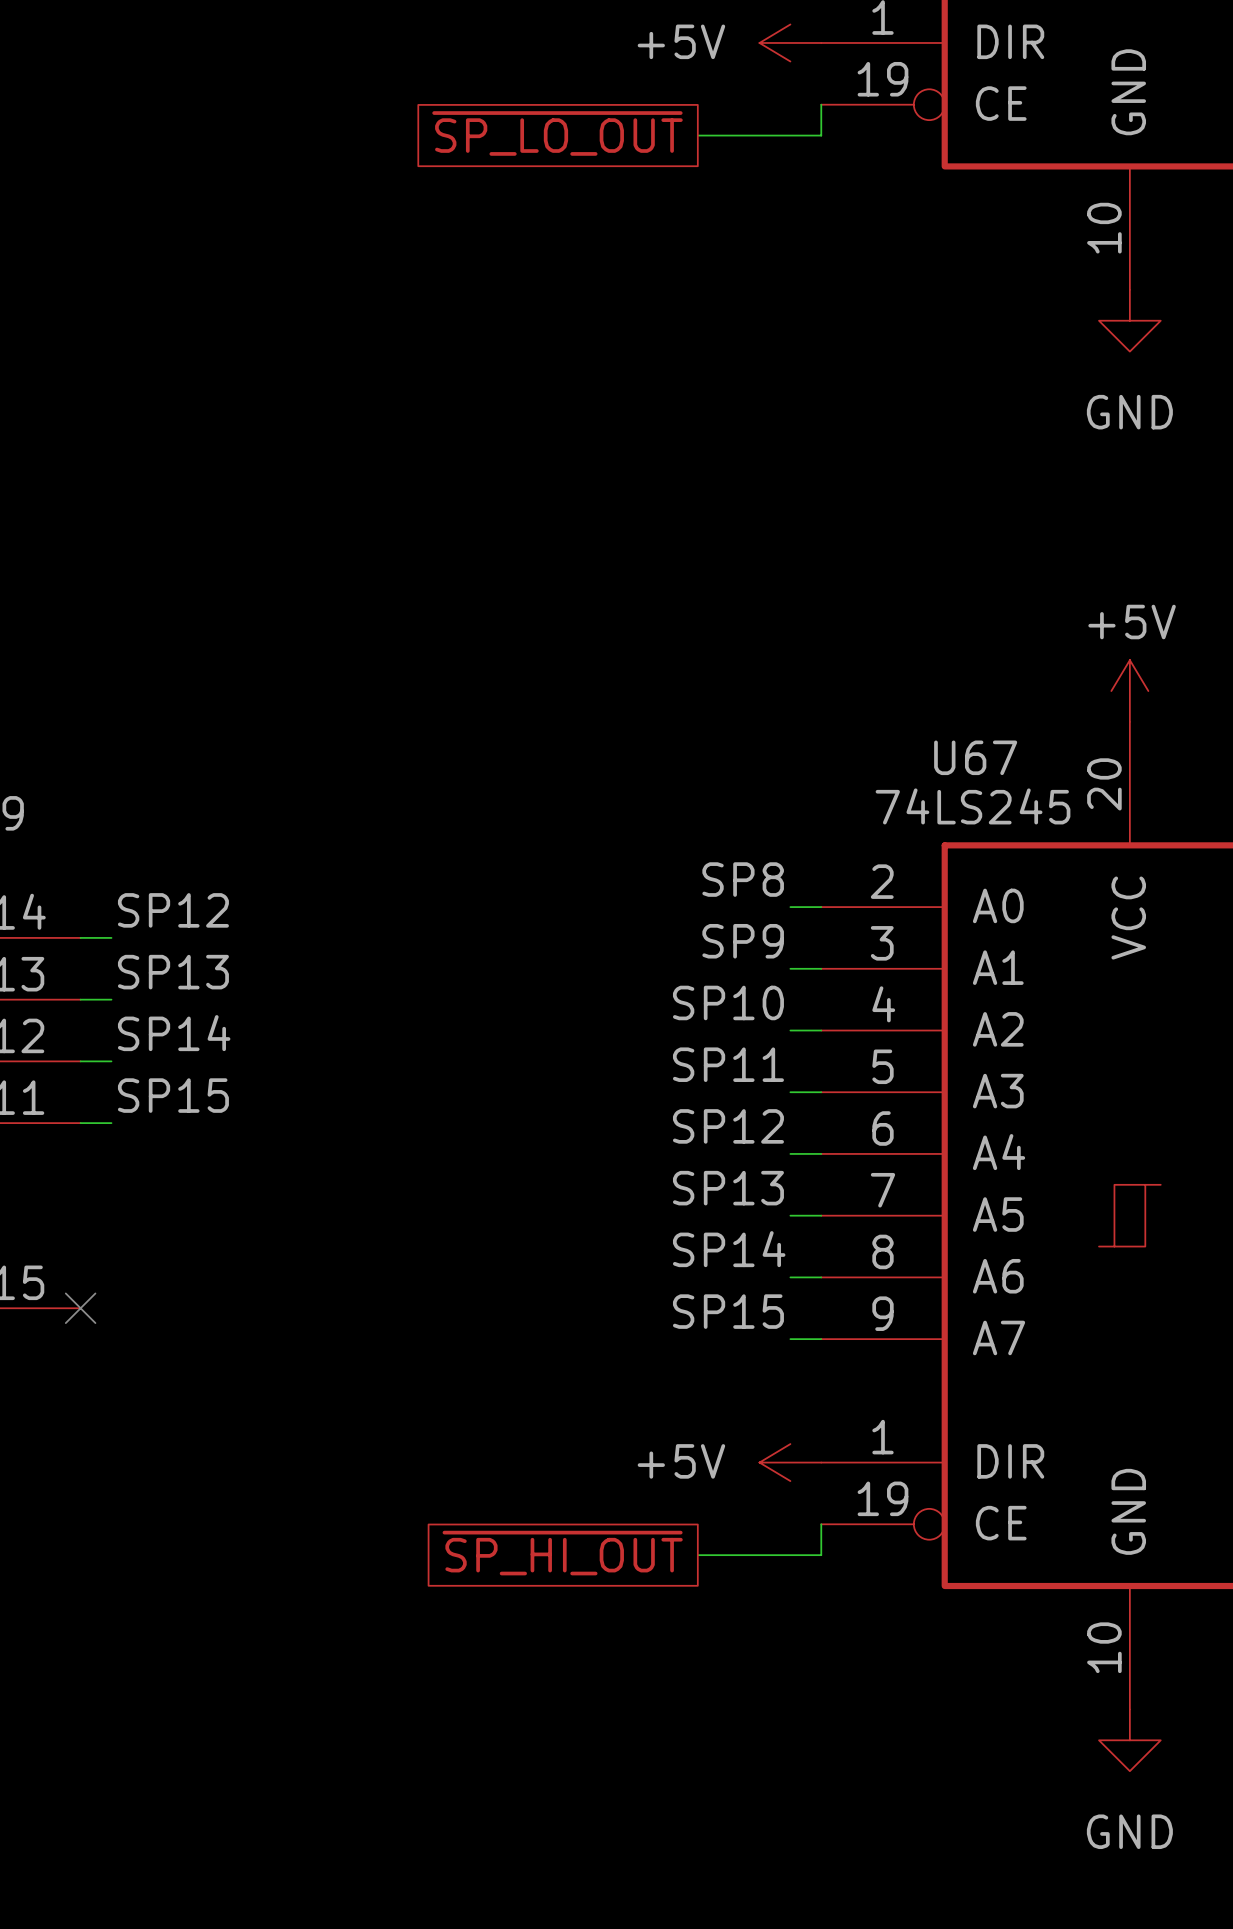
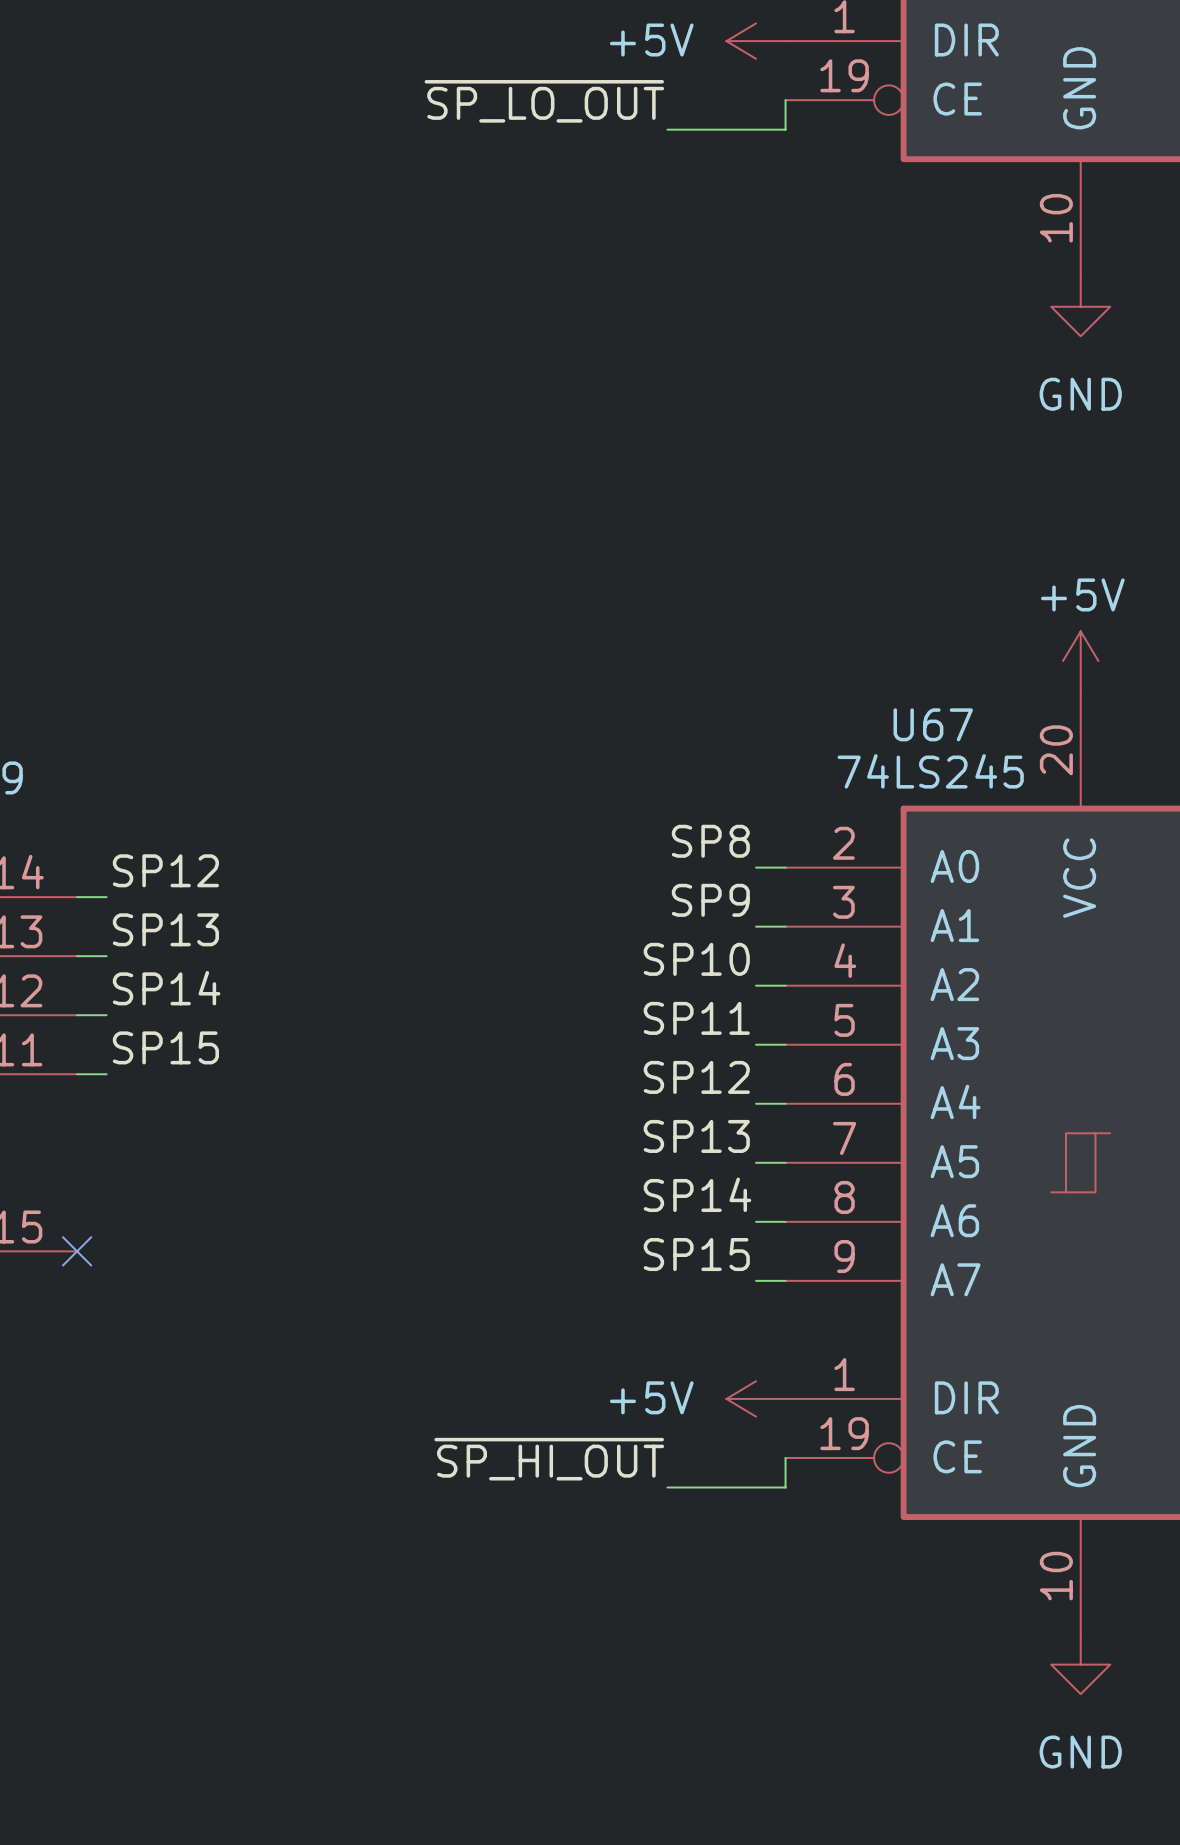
label: none -> ~{SP_LO_OUT} (544, 101)
global label: ~{SP_LO_OUT} (557, 133) -> none
label: none -> ~{SP_HI_OUT} (549, 1459)
global label: ~{SP_HI_OUT} (562, 1553) -> none

